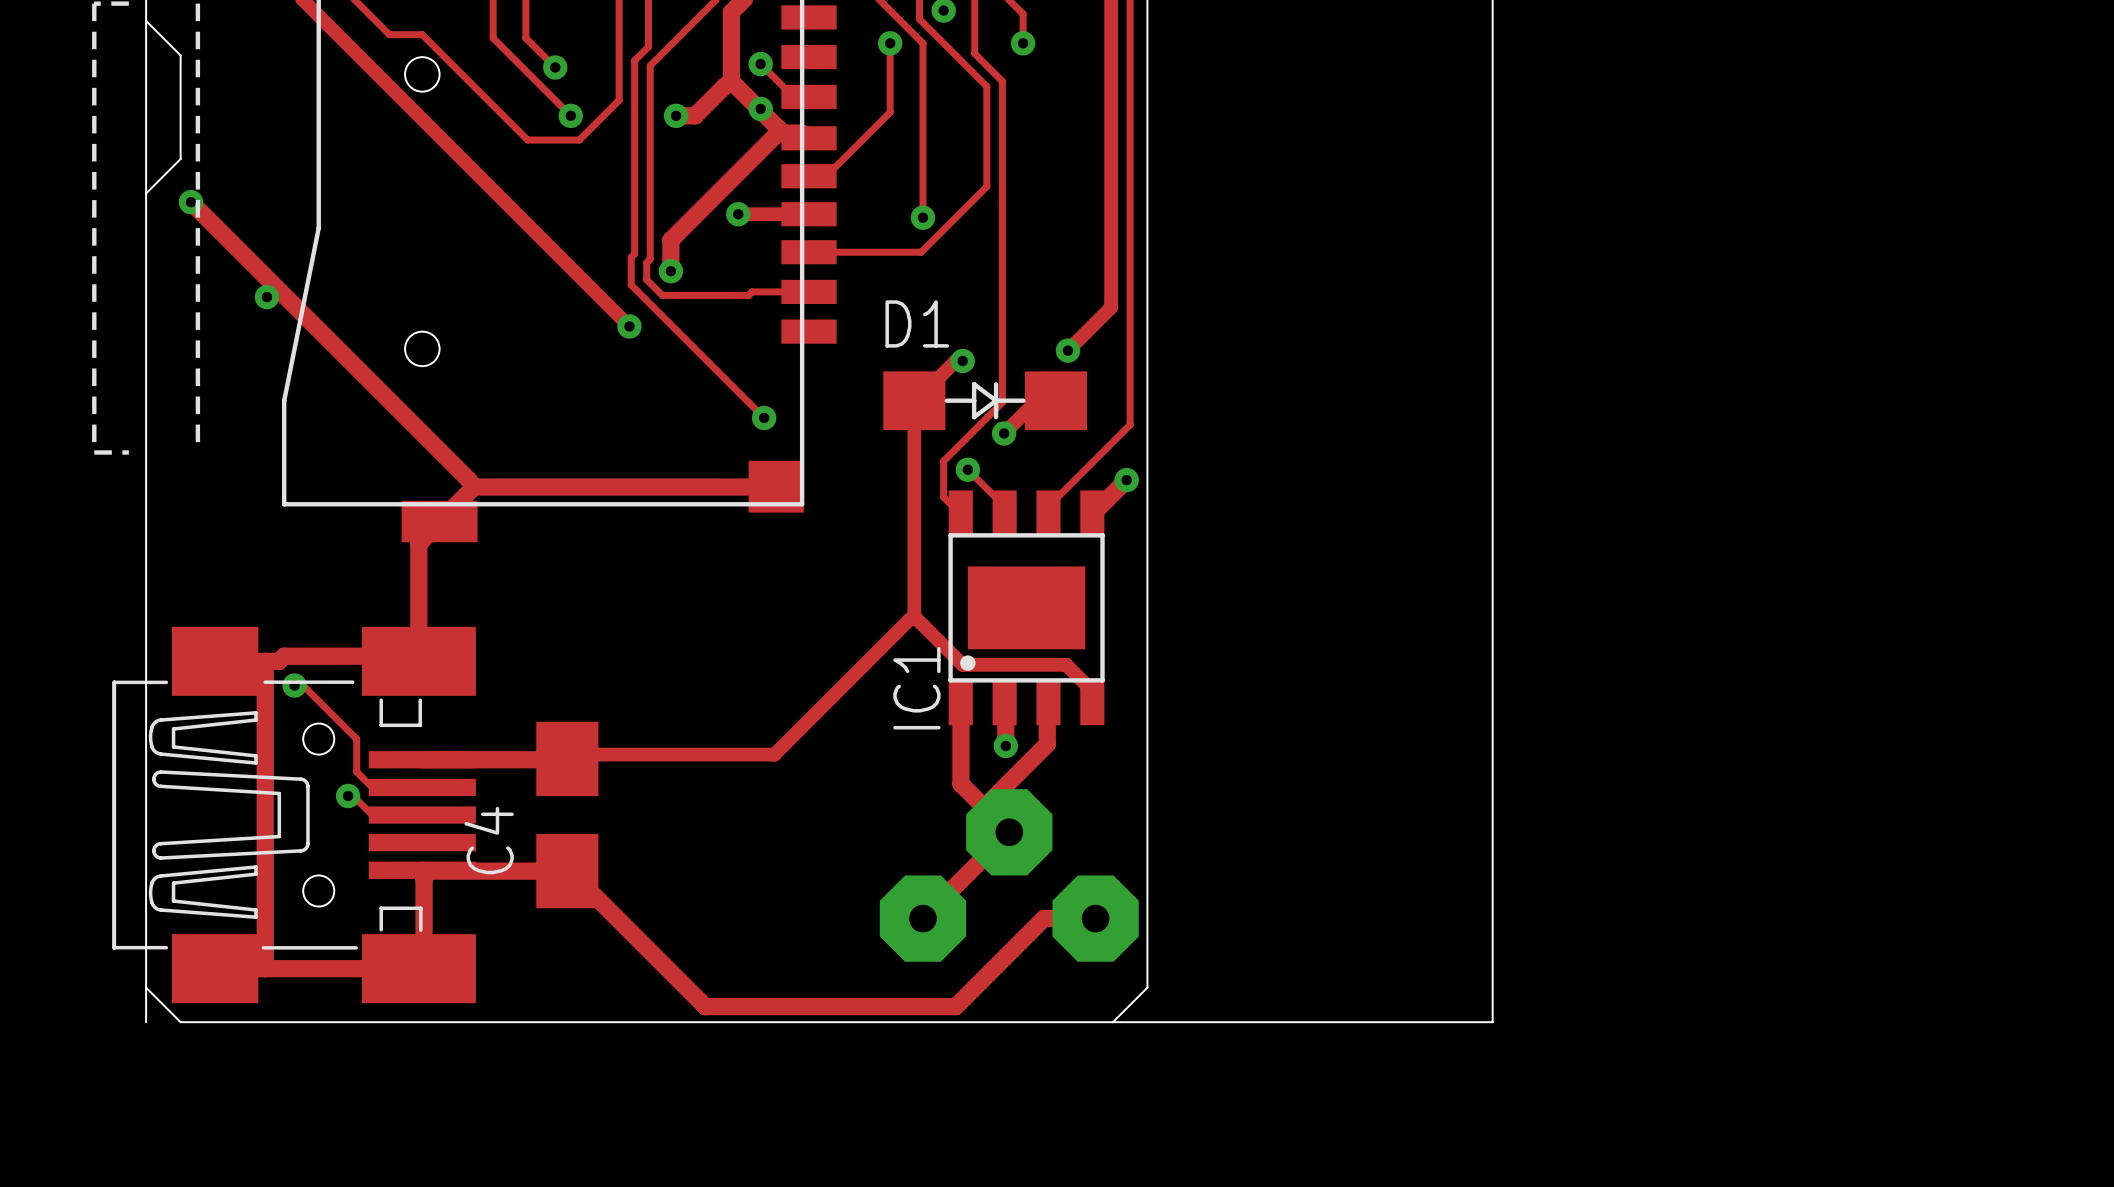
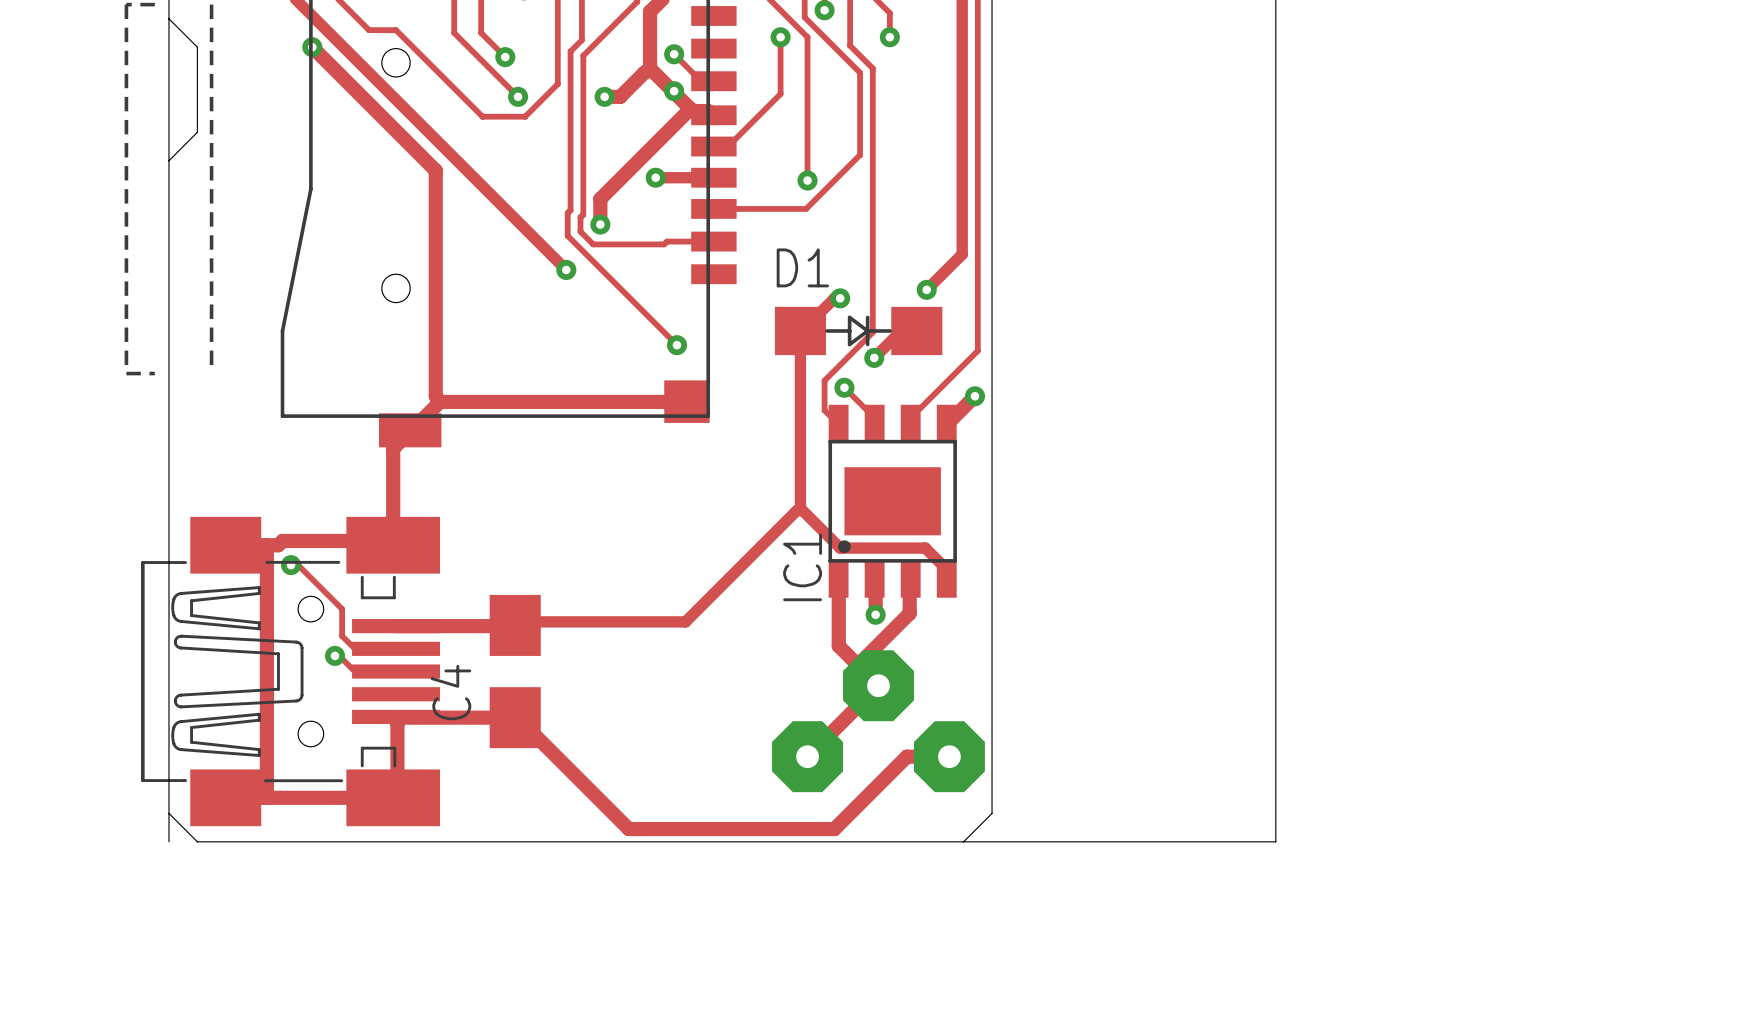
via: none -> (312, 47)
track: (190, 202) (468, 480) (474, 487) (439, 521) -> (312, 47) (435, 170) (435, 396) (440, 401) (410, 430)
via: (190, 202) -> none
via: (266, 297) -> none

